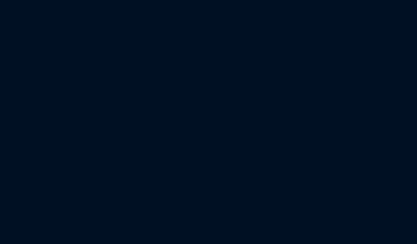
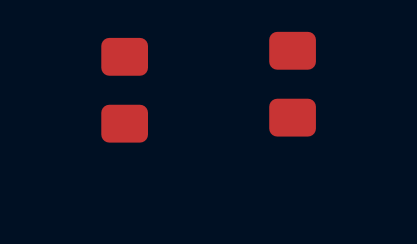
part: none -> (292, 84)
part: none -> (124, 90)

